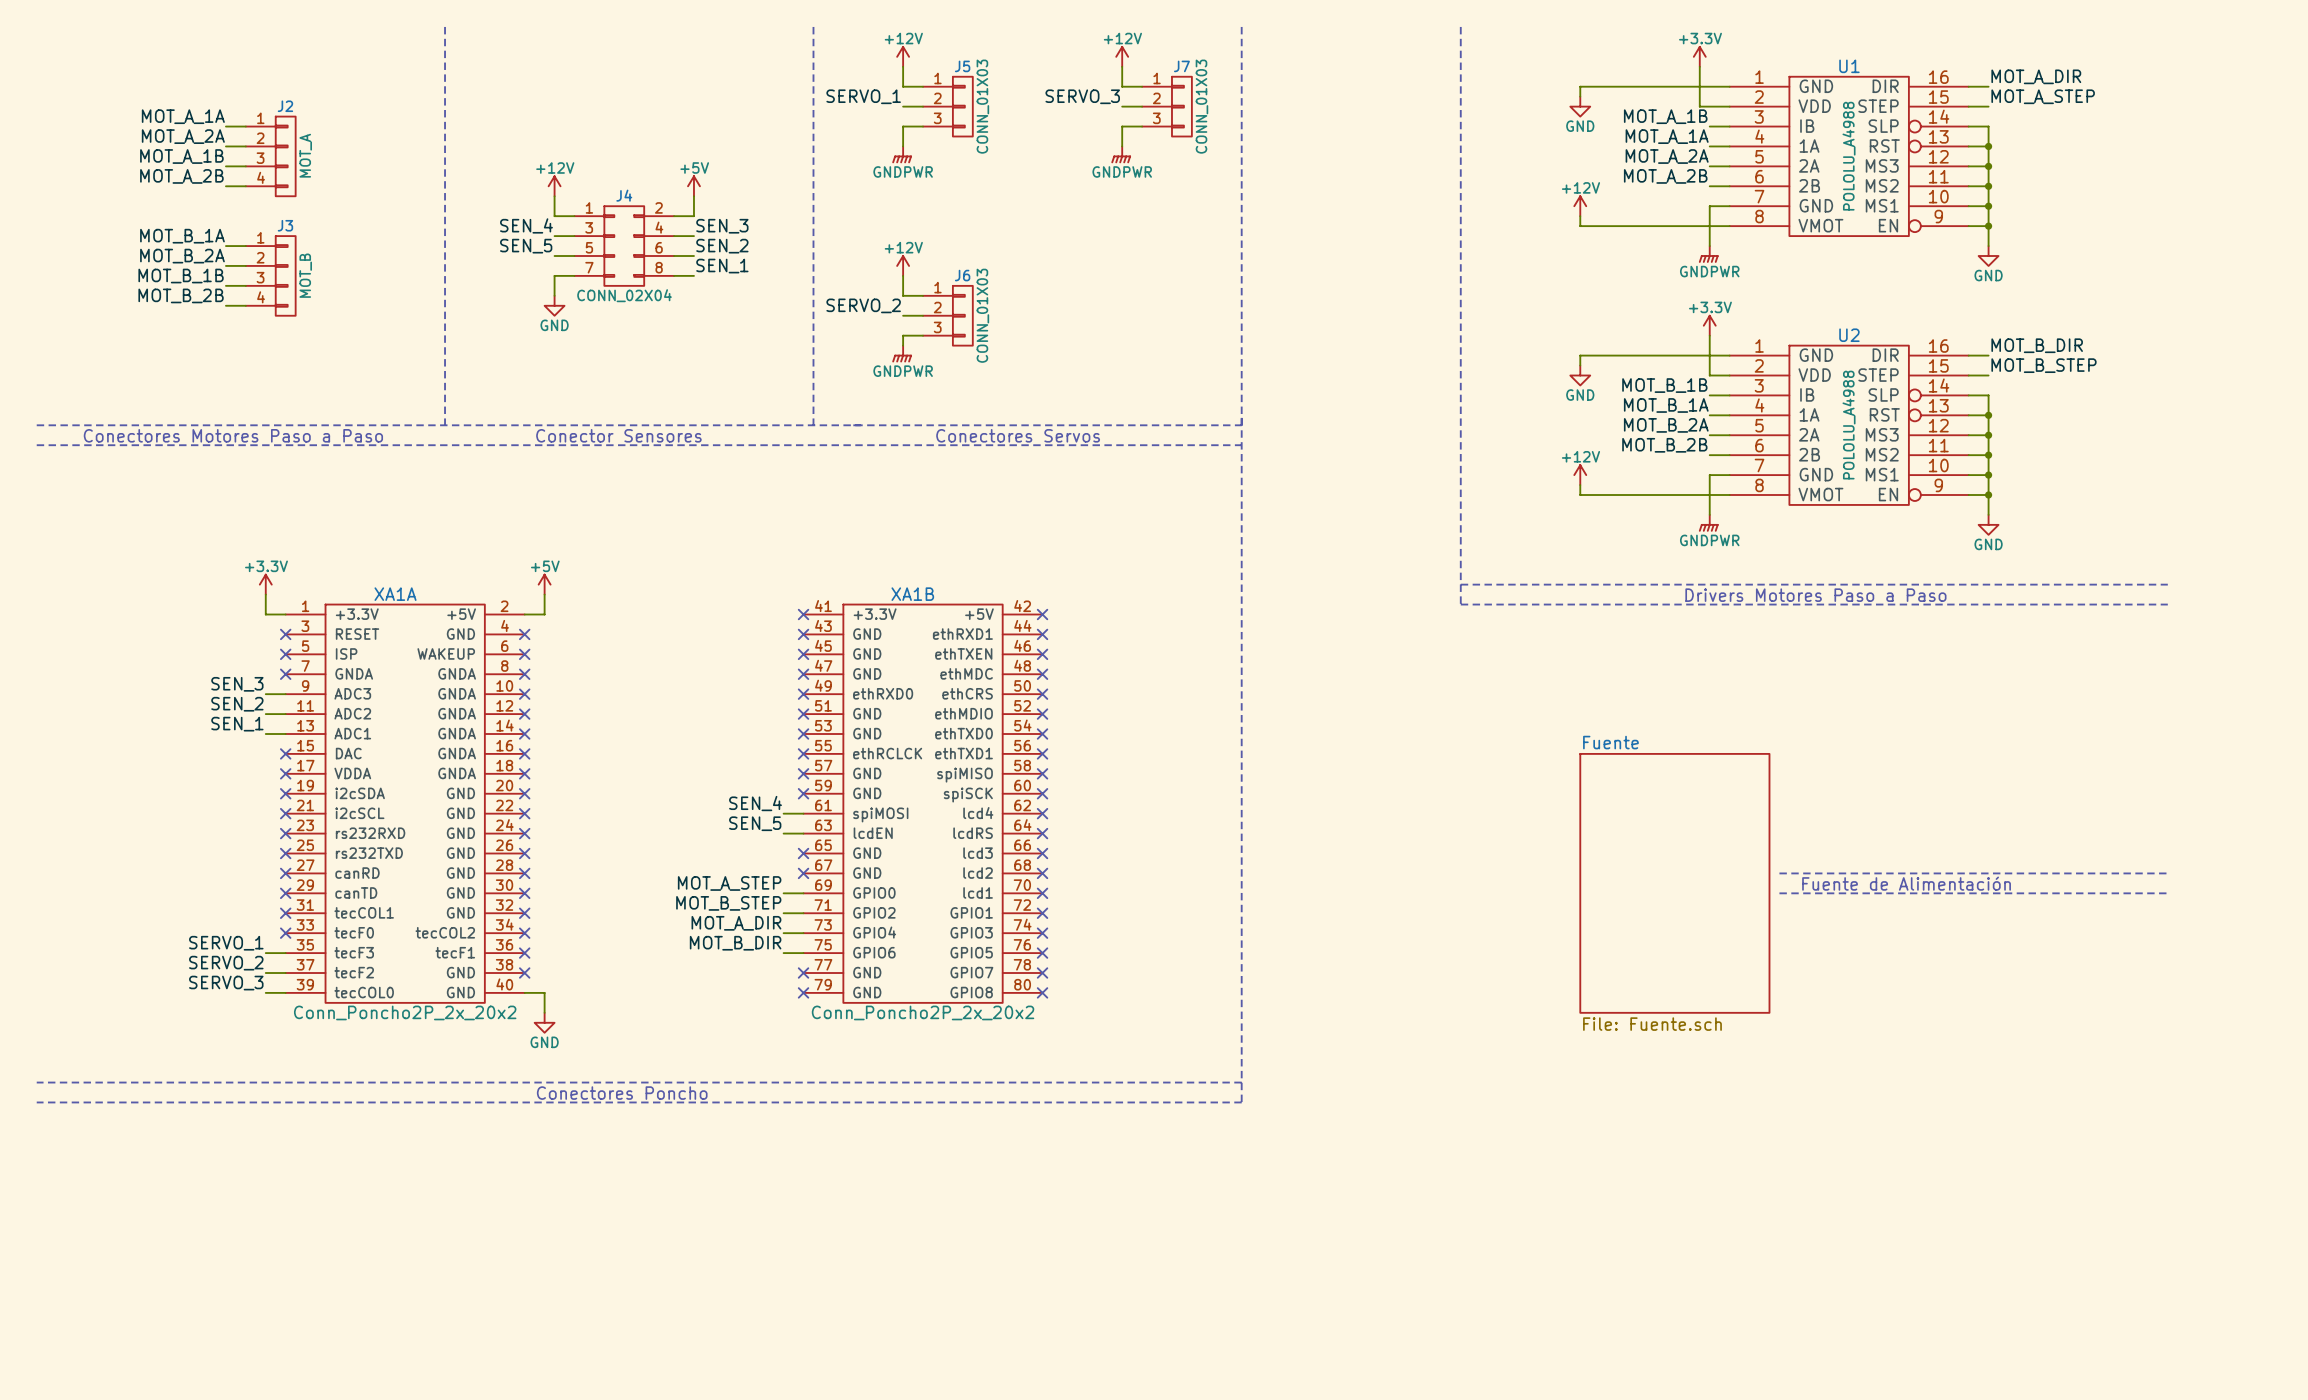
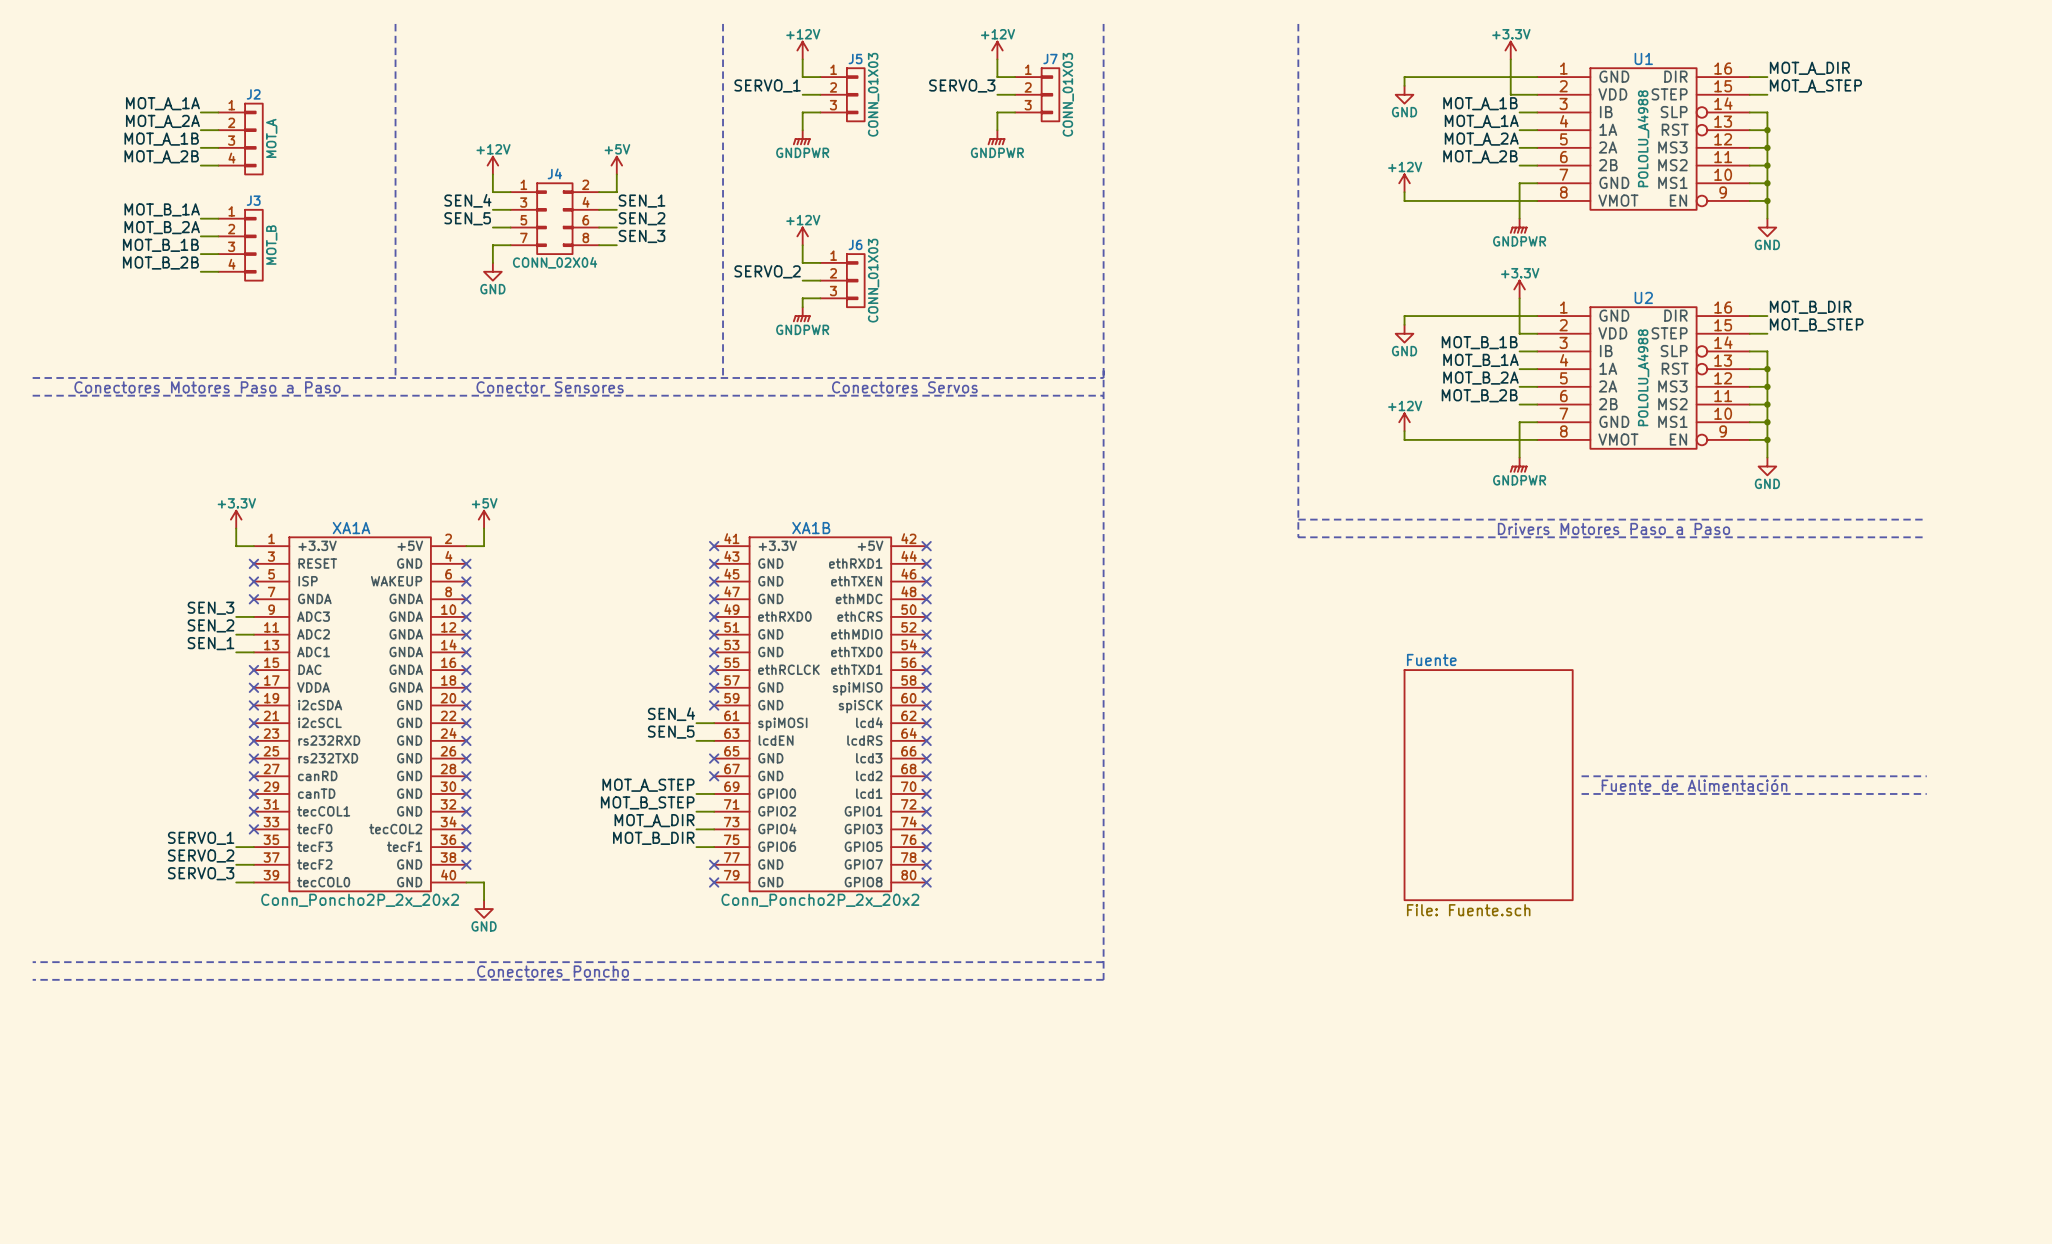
label: SEN_3 (722, 226) -> SEN_1 (642, 201)
label: SEN_1 (722, 266) -> SEN_3 (642, 236)

